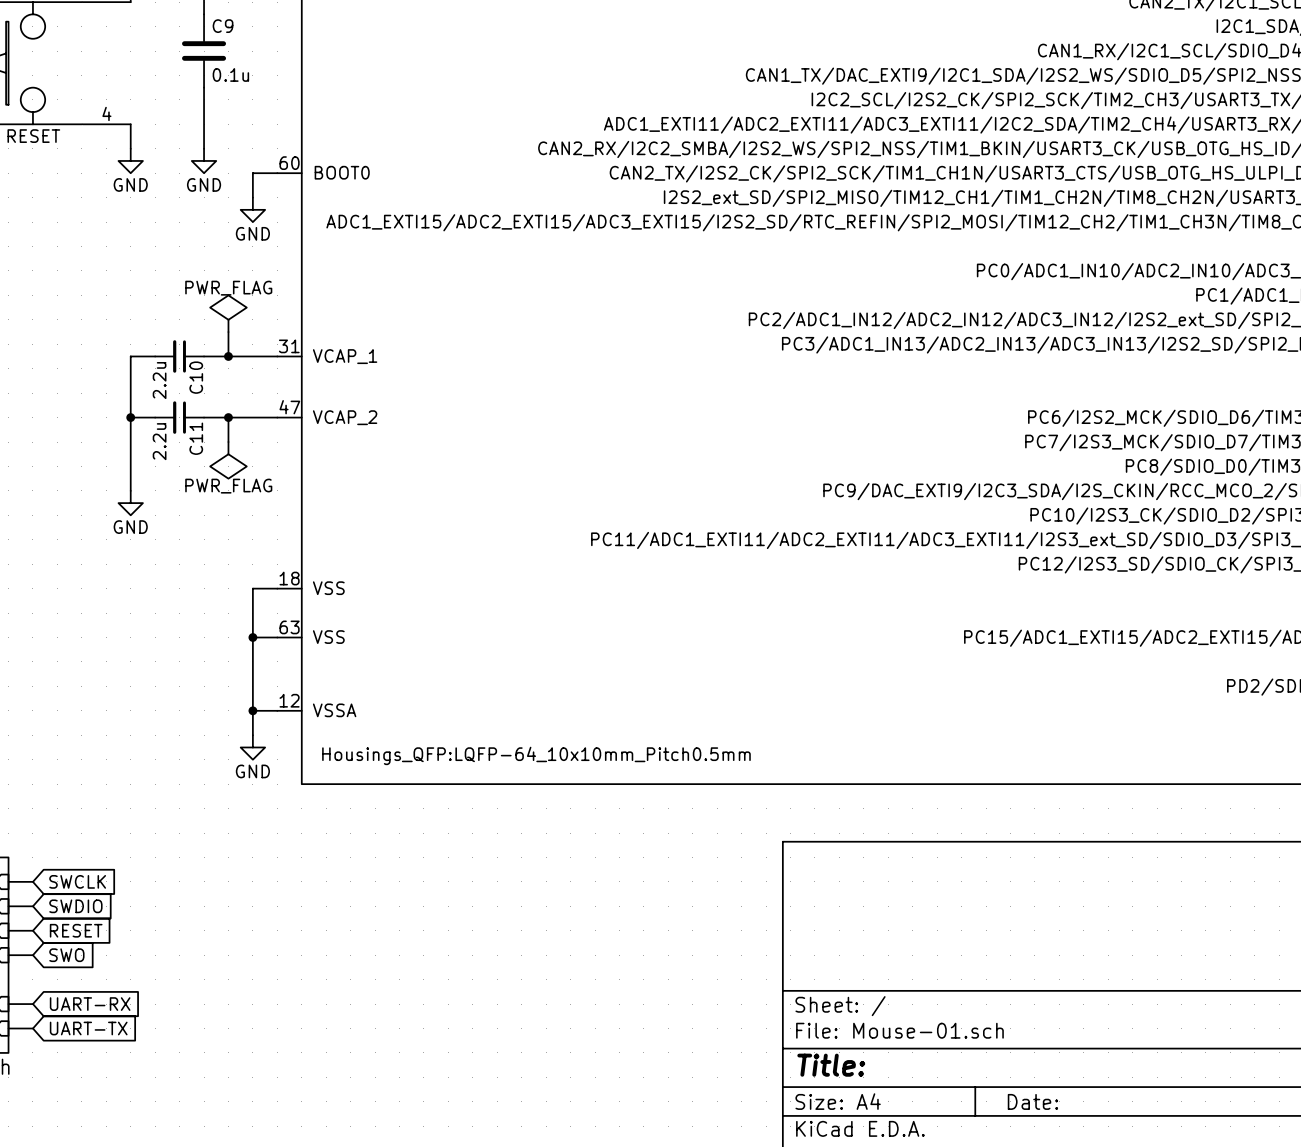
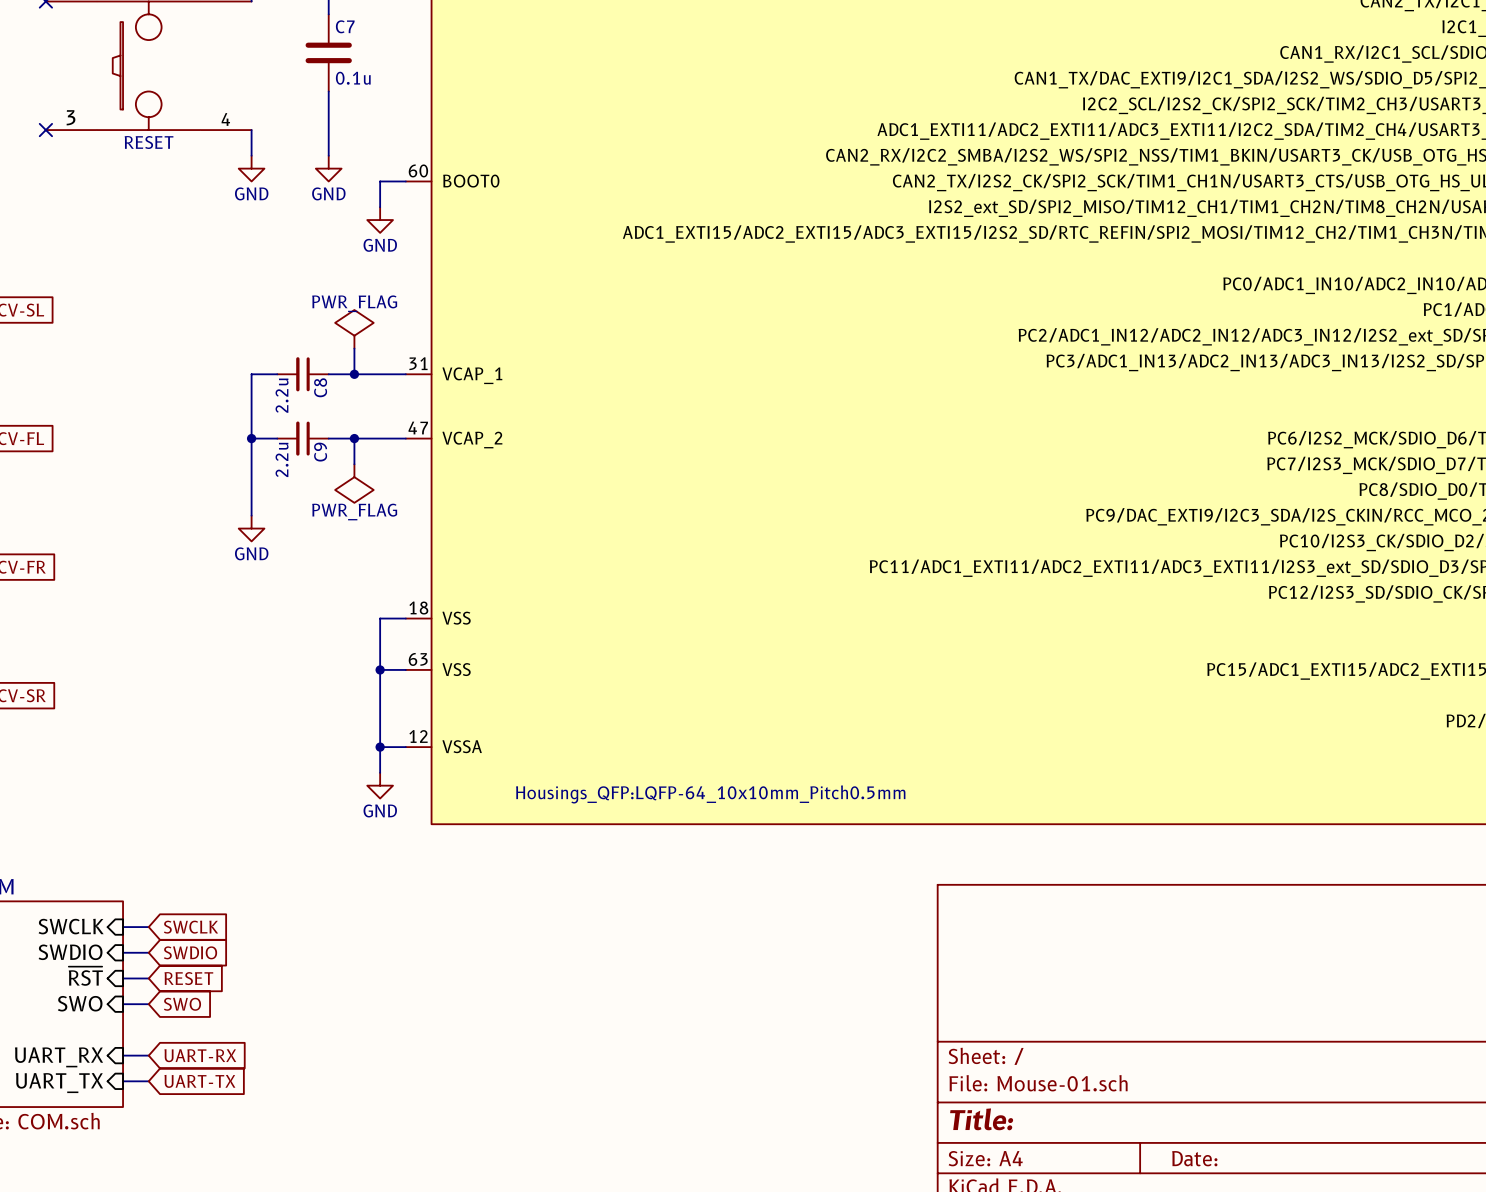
C9 name: C9 (223, 26) -> C7 (345, 26)
C10 name: C10 (196, 377) -> C8 (320, 387)
C11 name: C11 (196, 438) -> C9 (320, 452)

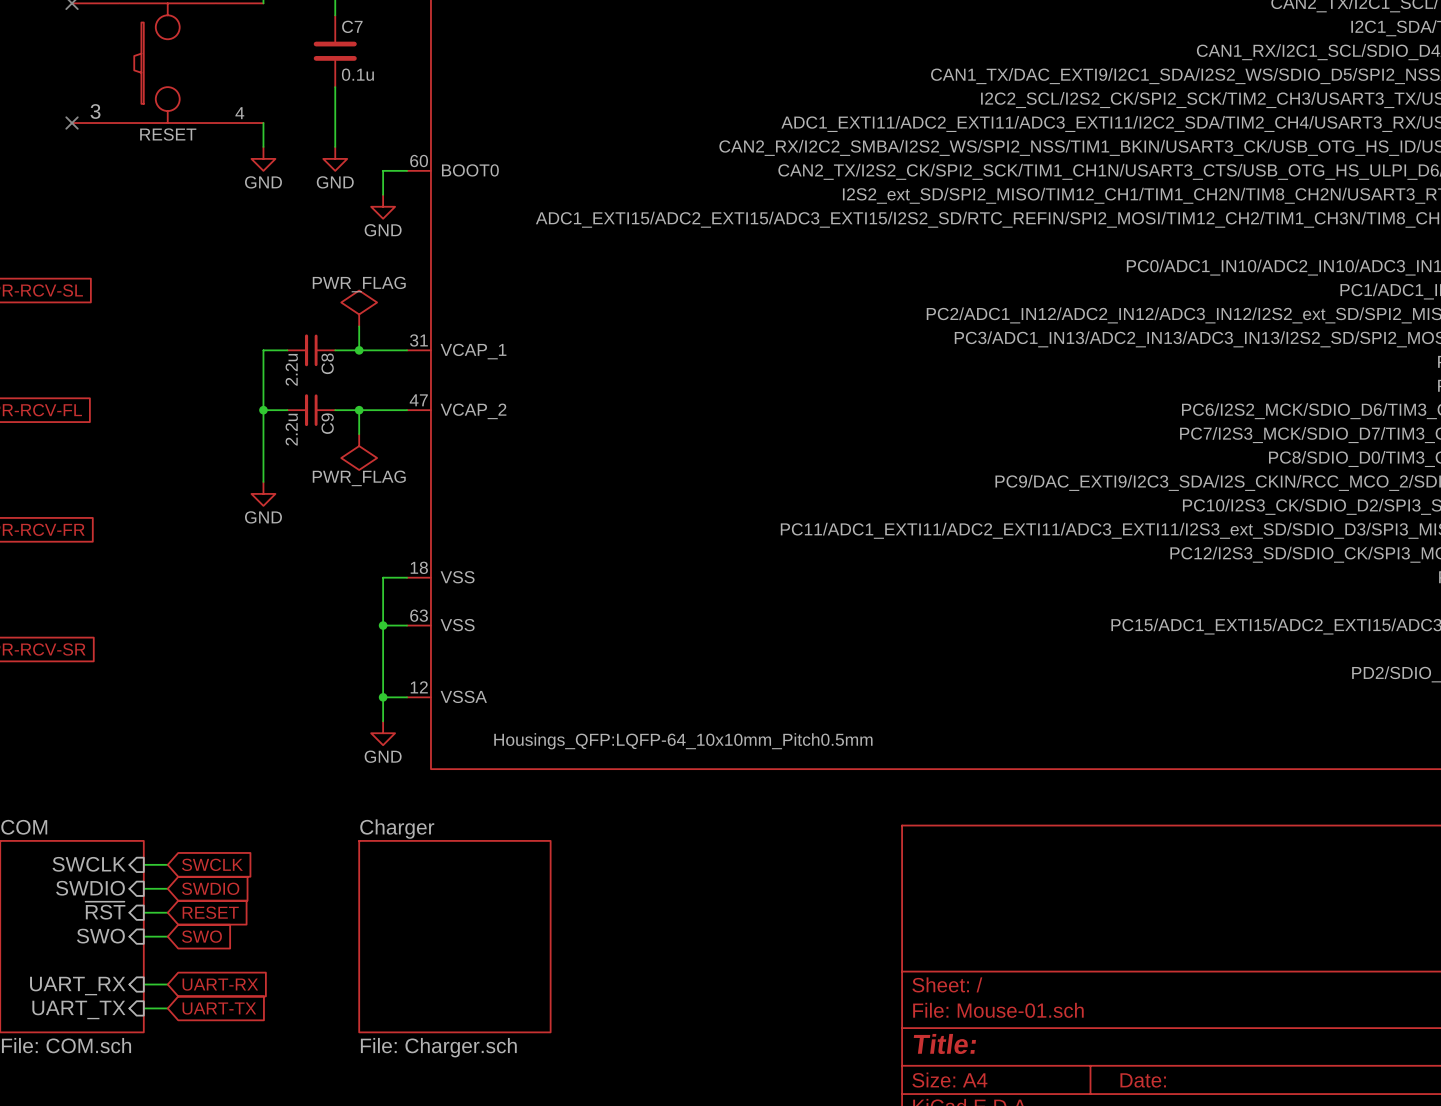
sheet Charger: none -> File: Charger.sch (454, 936)

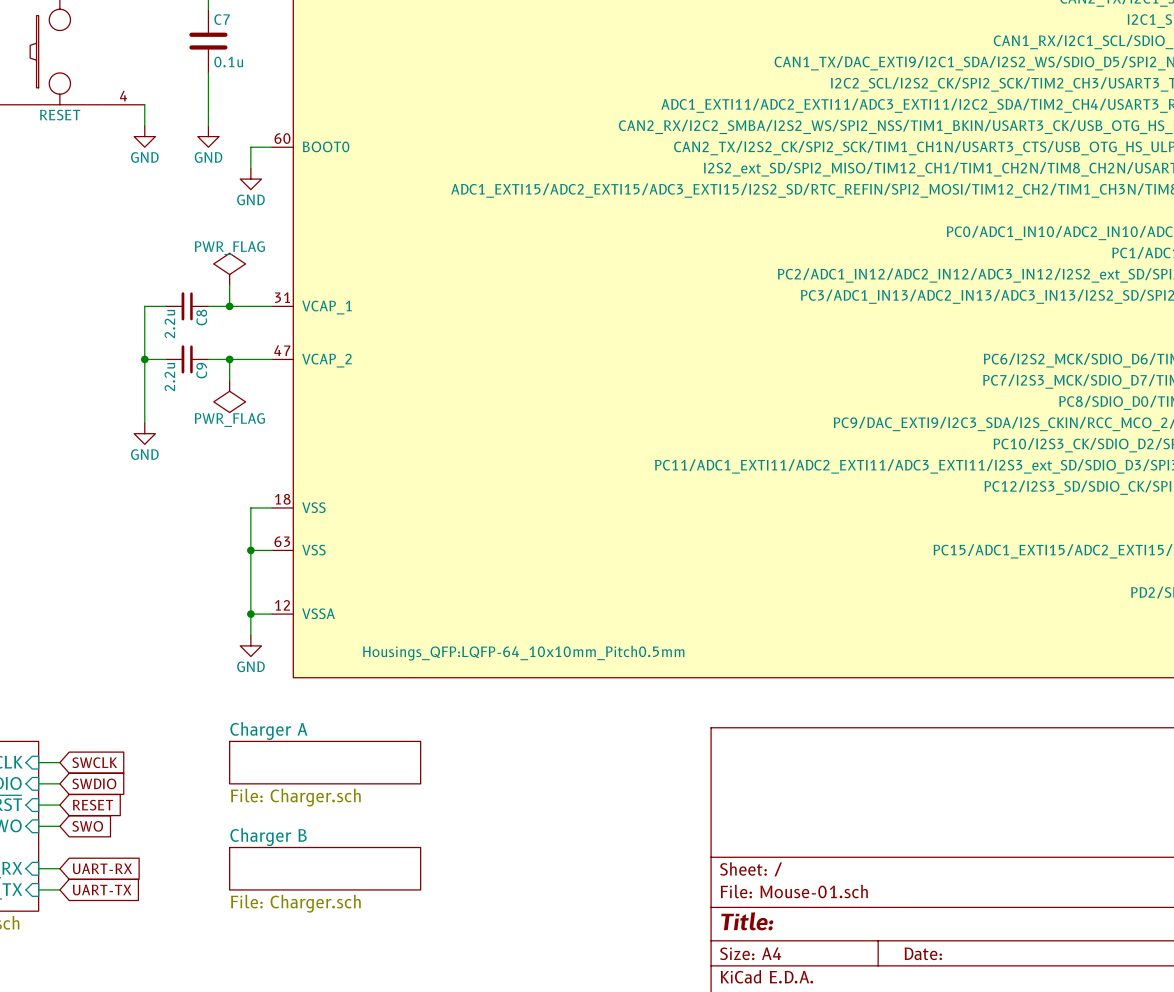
sheet Charger A: none -> File: Charger.sch (325, 762)
sheet Charger: File: Charger.sch (454, 936) -> none
sheet Charger B: none -> File: Charger.sch (325, 868)

